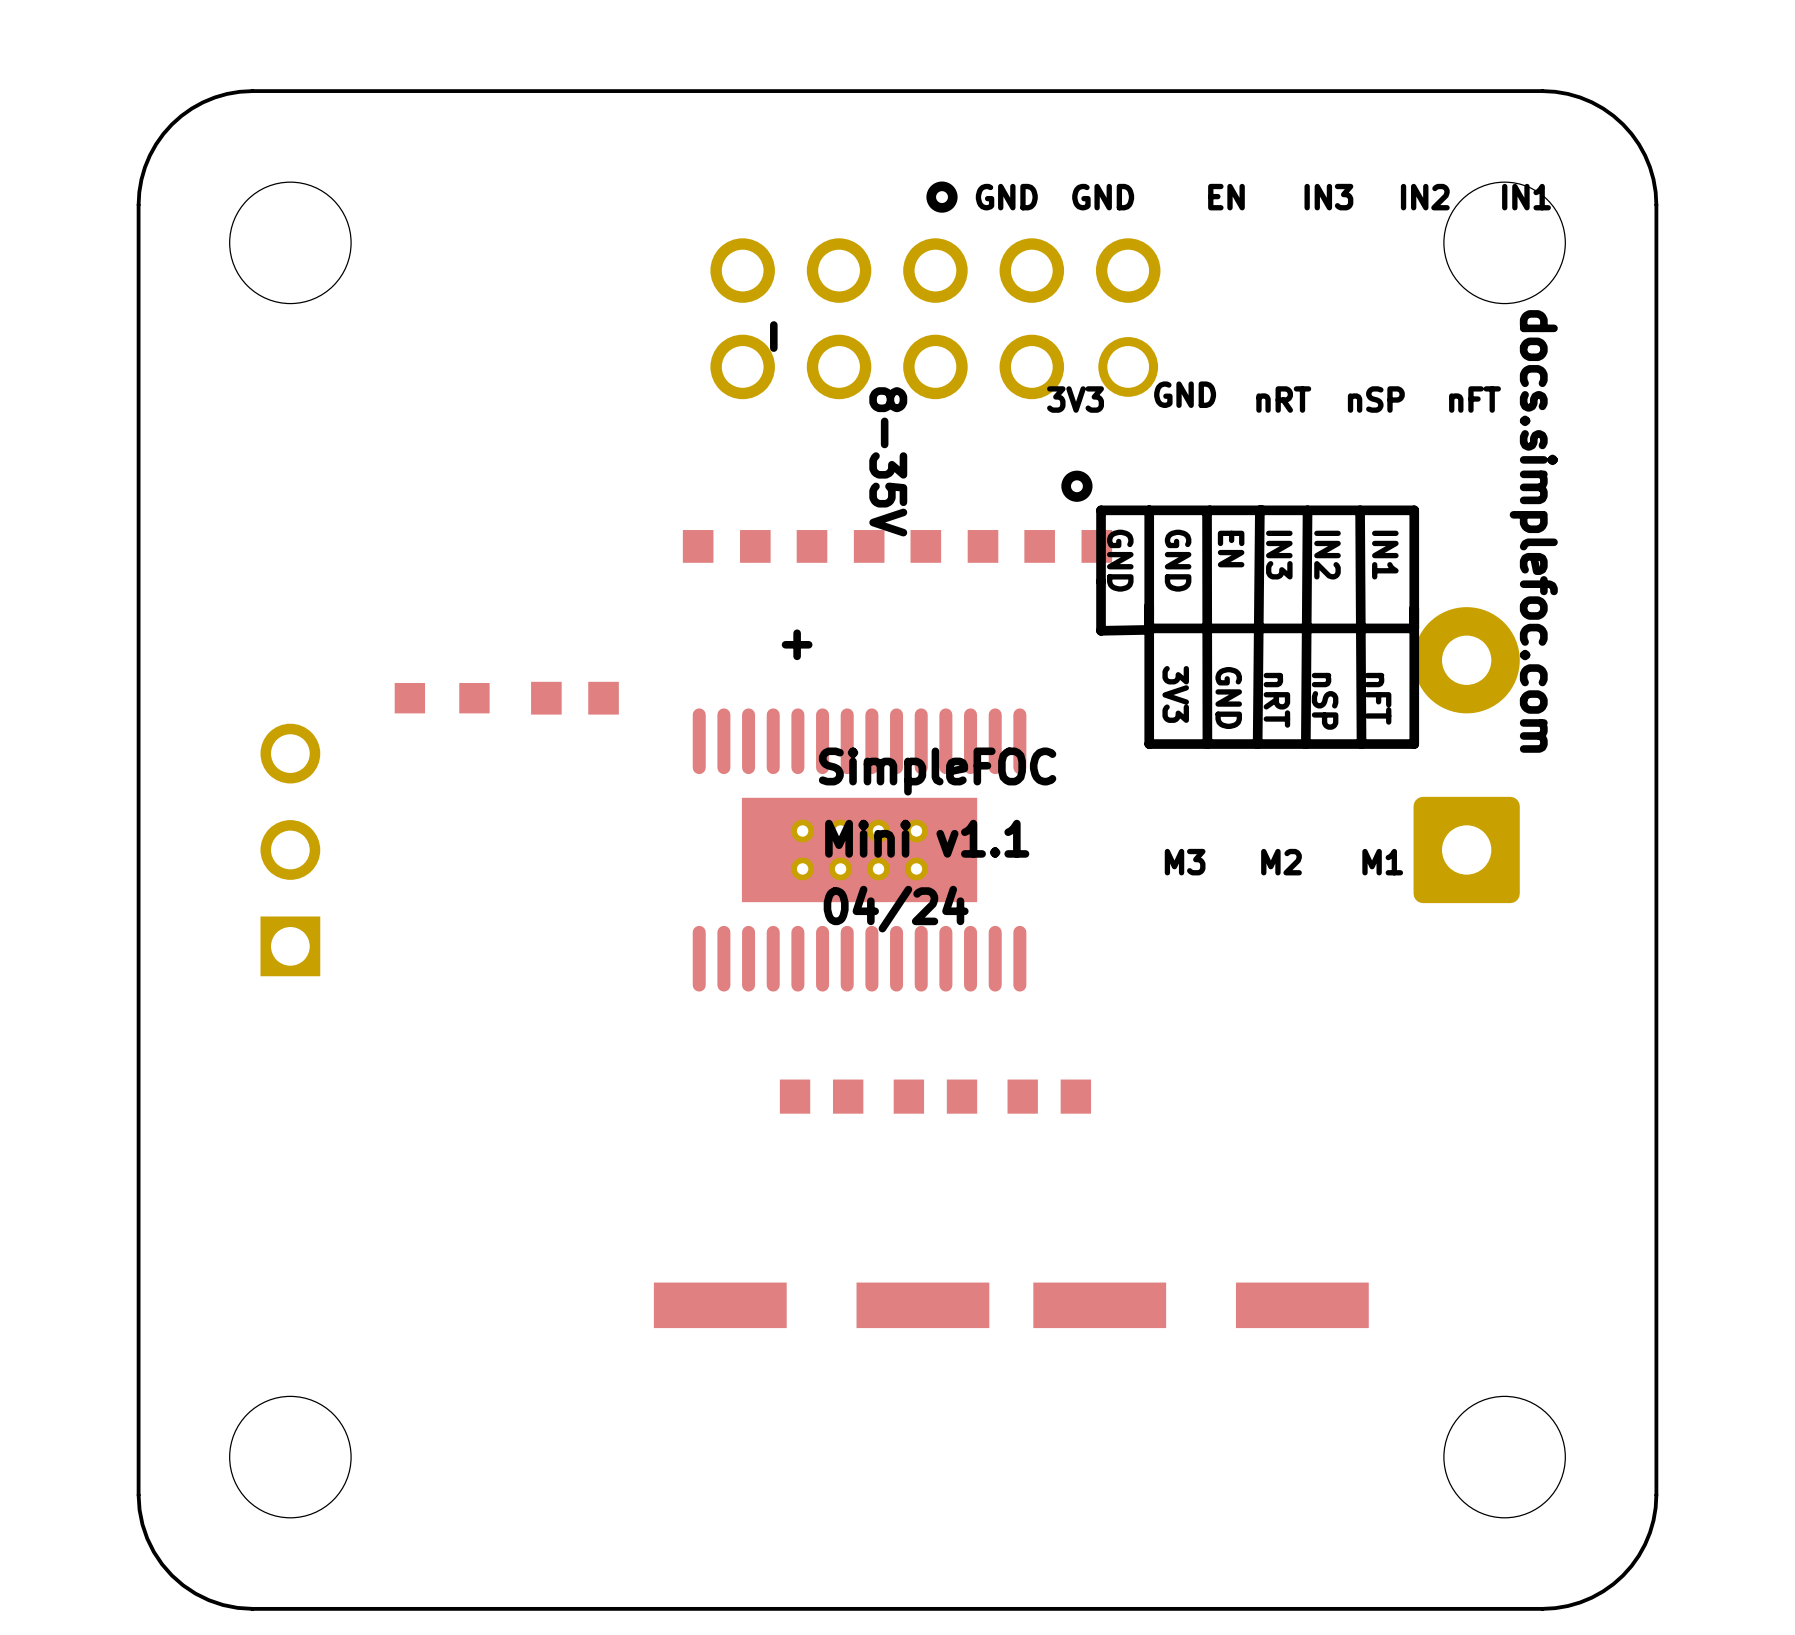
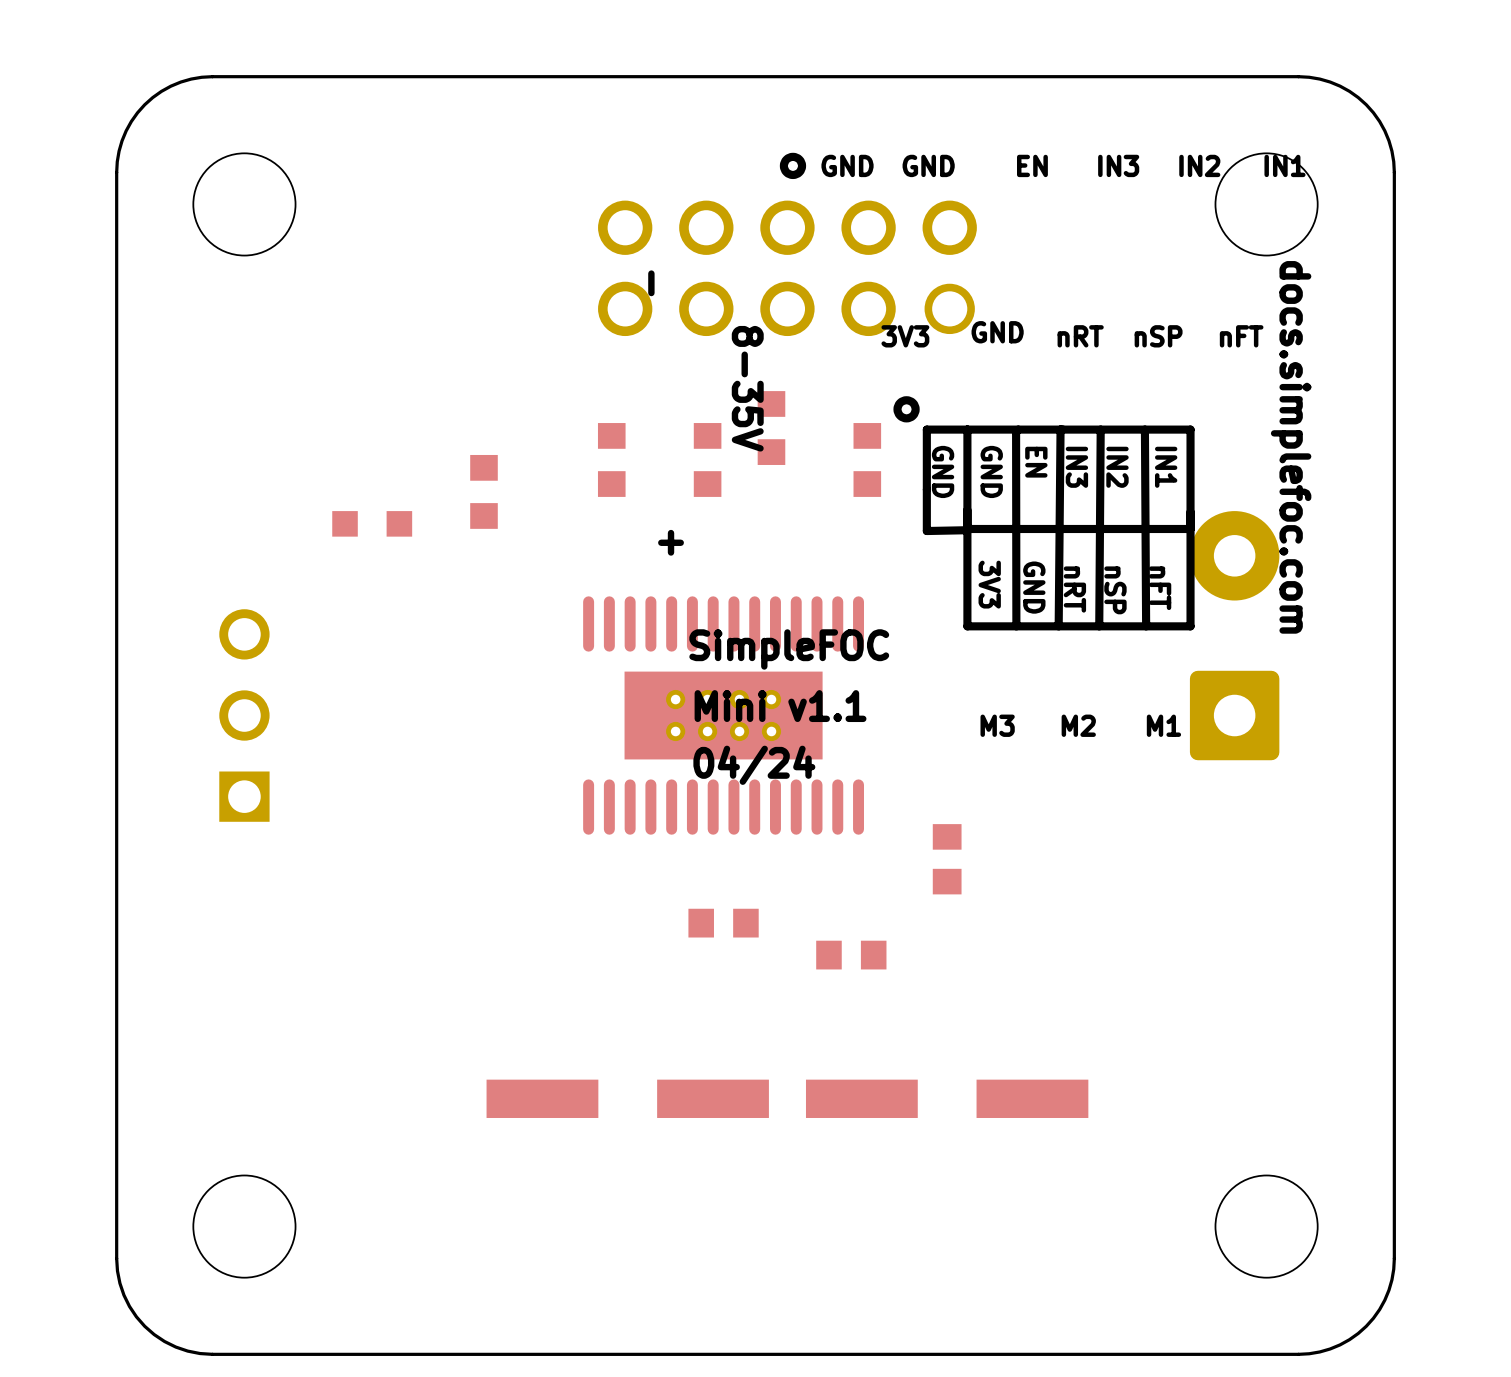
part: none -> (771, 428)
part rotation: 0° (726, 546) -> 90° clockwise (611, 459)
part rotation: 0° (840, 546) -> 90° clockwise (707, 459)
part: (954, 546) -> none
part: none -> (867, 459)
part: (1068, 546) -> none
part position: (442, 698) -> (372, 523)
part rotation: 0° (574, 698) -> 90° clockwise (484, 491)
part position: (574, 698) -> (484, 491)
part: none -> (947, 859)
part: (821, 1096) -> none
part: none -> (723, 923)
part: (935, 1096) -> none
part: (1049, 1096) -> none
part: none -> (851, 955)
part position: (821, 1305) -> (627, 1098)
part position: (1201, 1305) -> (947, 1098)

